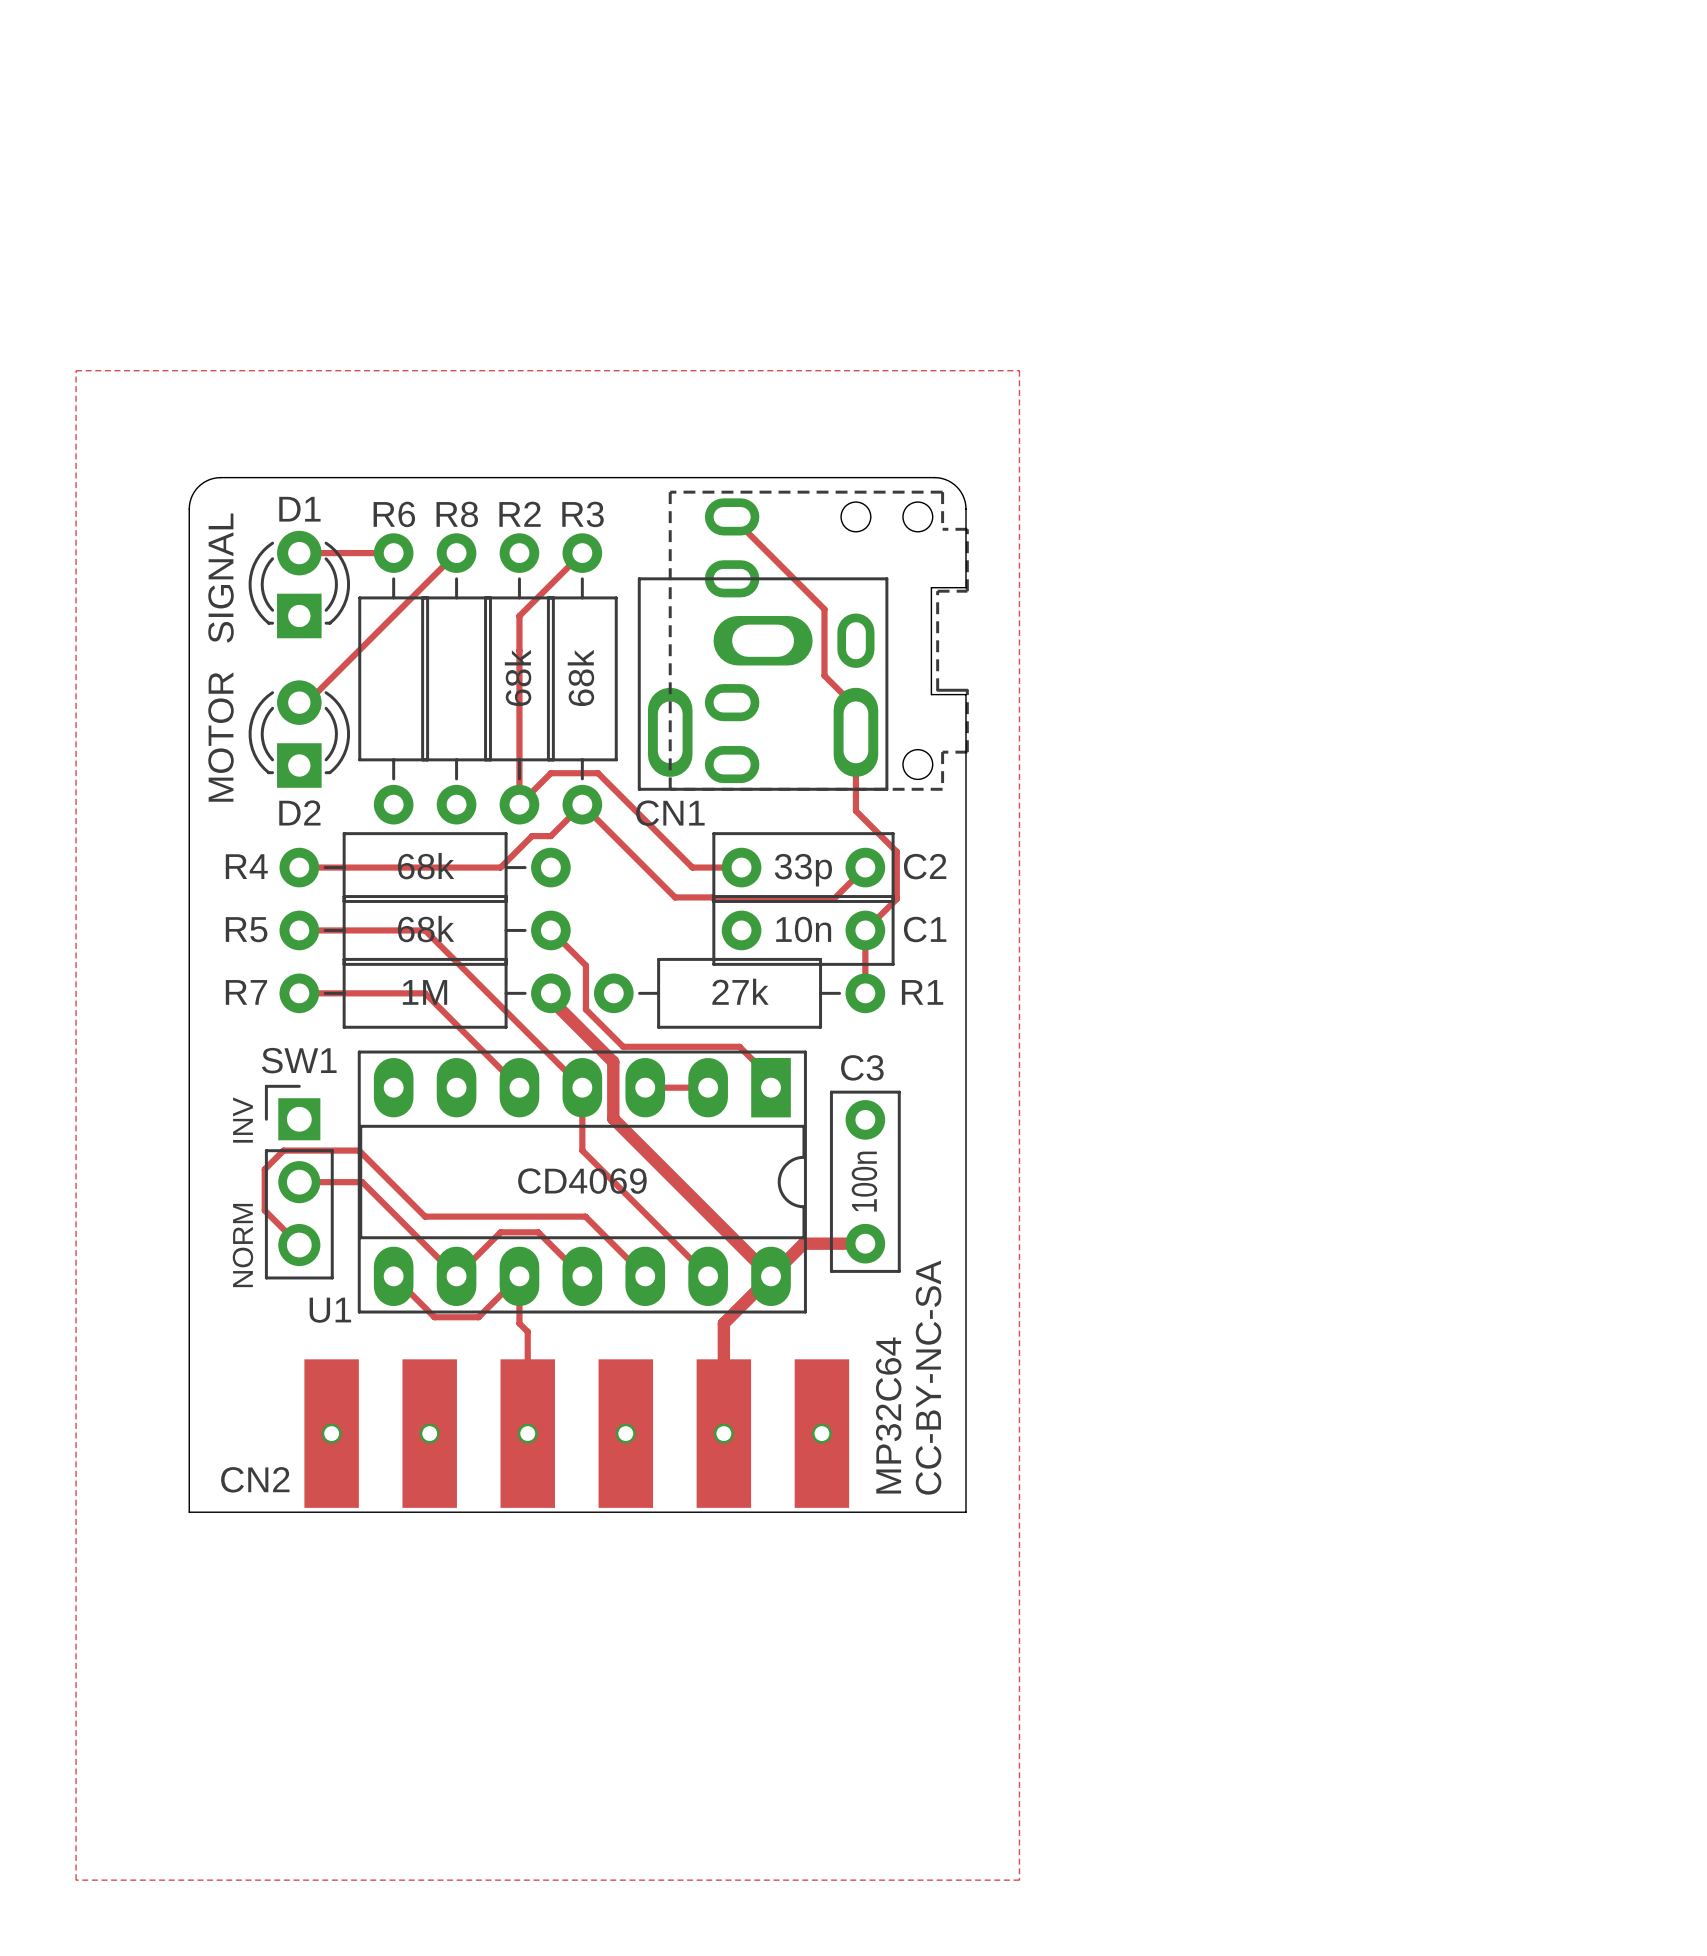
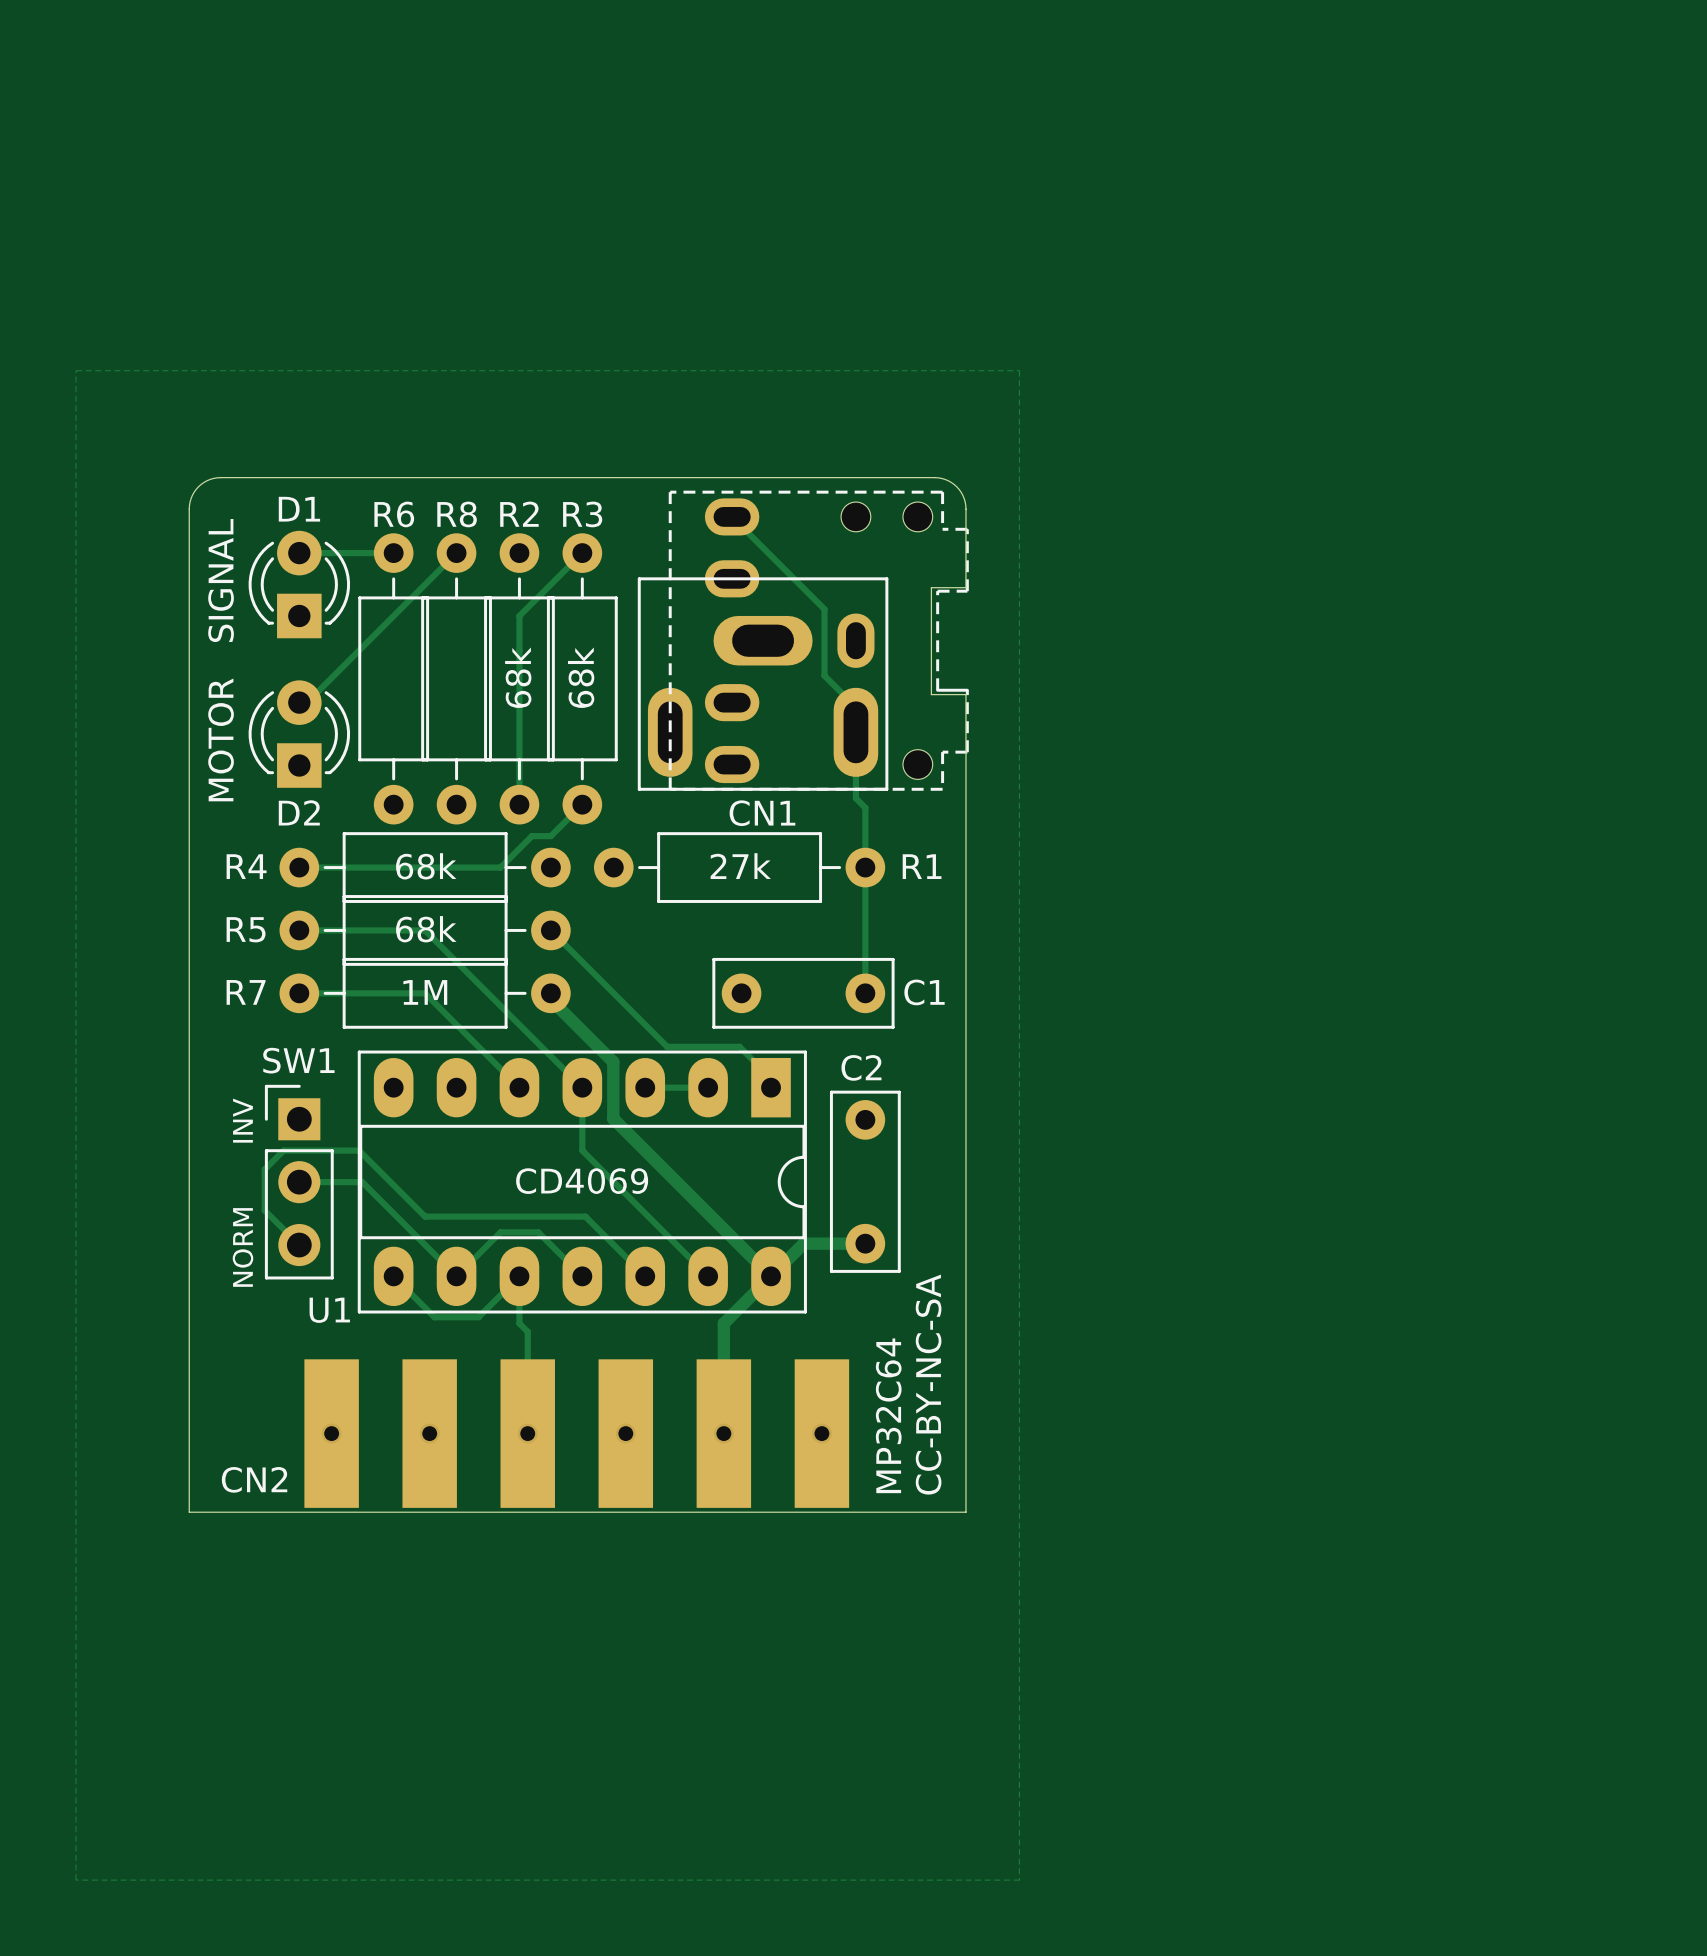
track: (855, 798) (855, 810) (896, 851) (896, 899) (865, 930) -> (855, 798) (865, 807) (865, 930)
track: (519, 804) (550, 773) (598, 773) (692, 867) (741, 867) -> none
track: (582, 804) (675, 897) (833, 899) (865, 867) -> none
CN1 name position: CN1 (670, 813) -> CN1 (762, 813)
C2: 33p (803, 867) -> none
C1 value: 10n (803, 929) -> none
C1 position: (803, 930) -> (803, 993)
track: (585, 965) (585, 1009) (623, 1046) (667, 1046) -> (585, 965) (667, 1046)
R1 position: (739, 993) -> (739, 867)
C3 name: C3 (862, 1067) -> C2 (861, 1067)
C3 value: 100n (864, 1181) -> none

